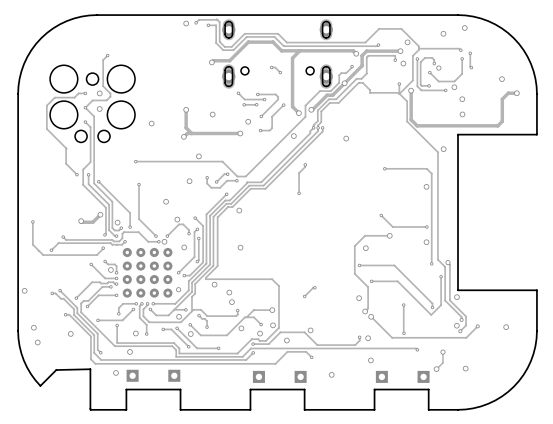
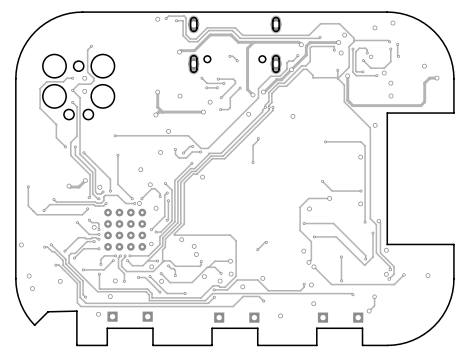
via: (151, 123) -> none
via: (240, 247) -> none
via: (465, 368) -> none

